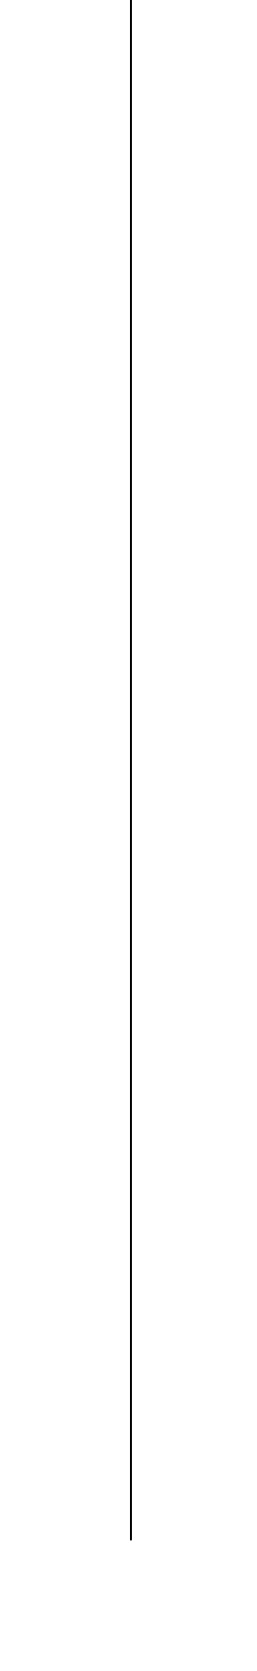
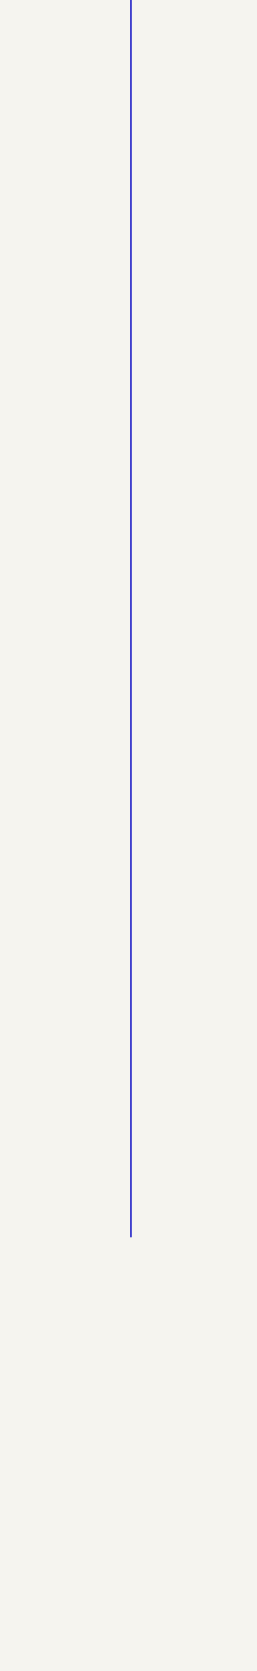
line: (130, 1236) (130, 1539) -> none

